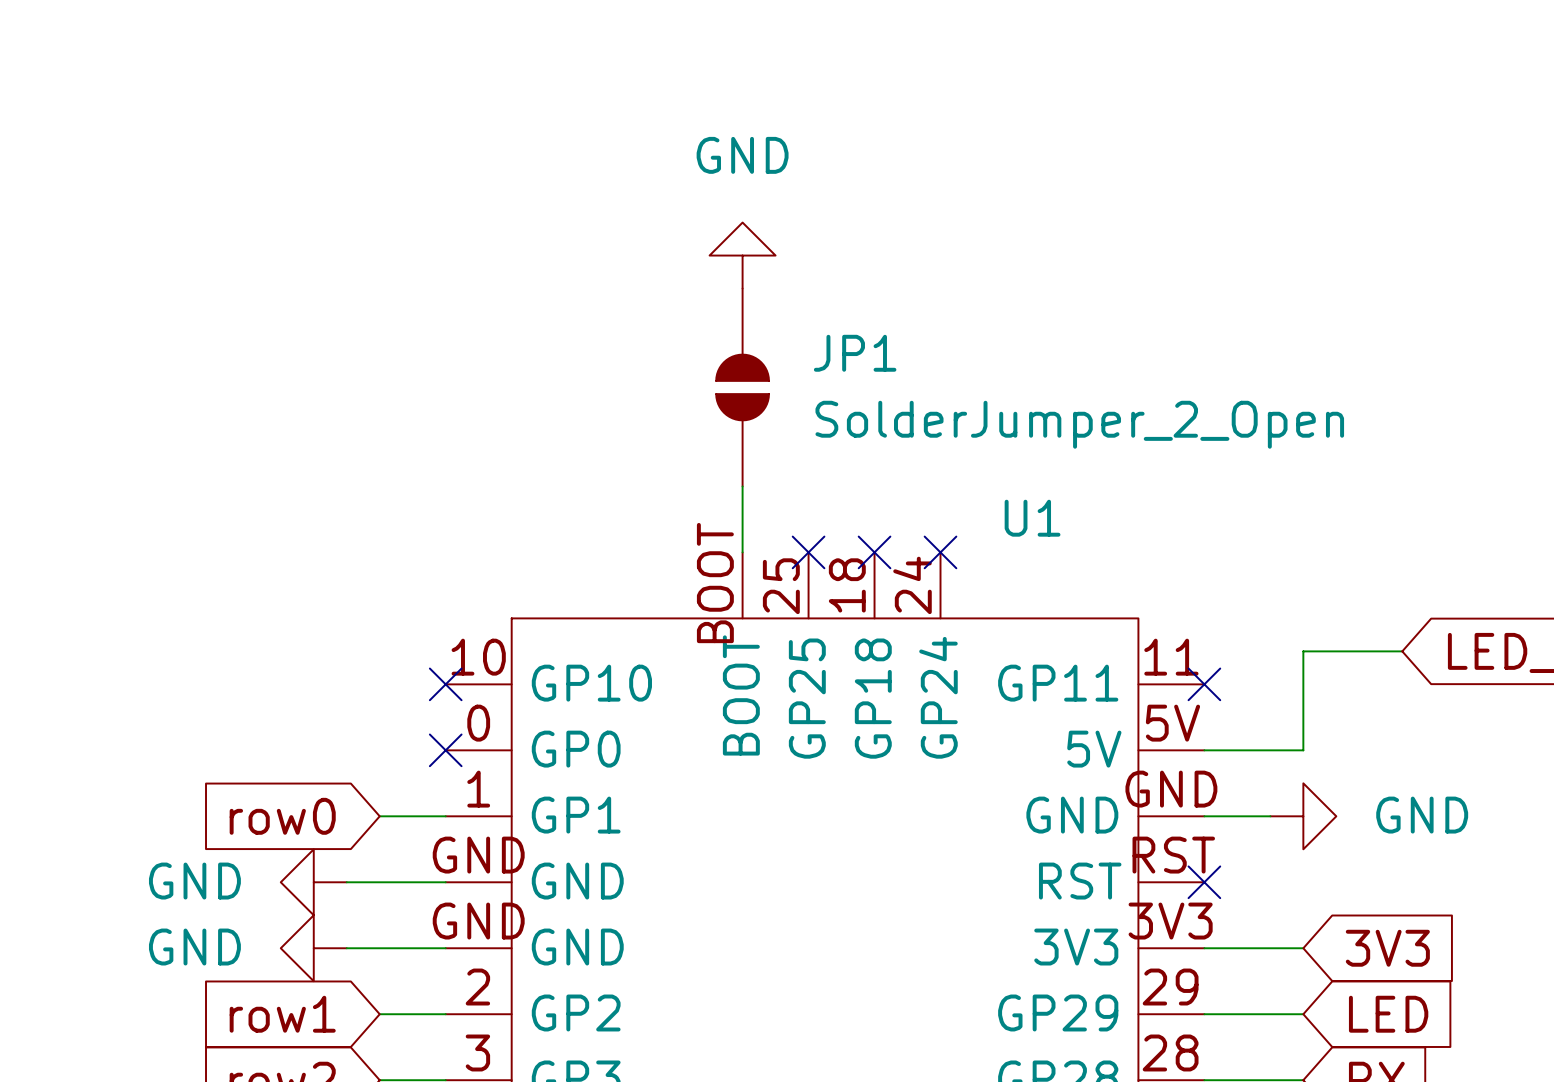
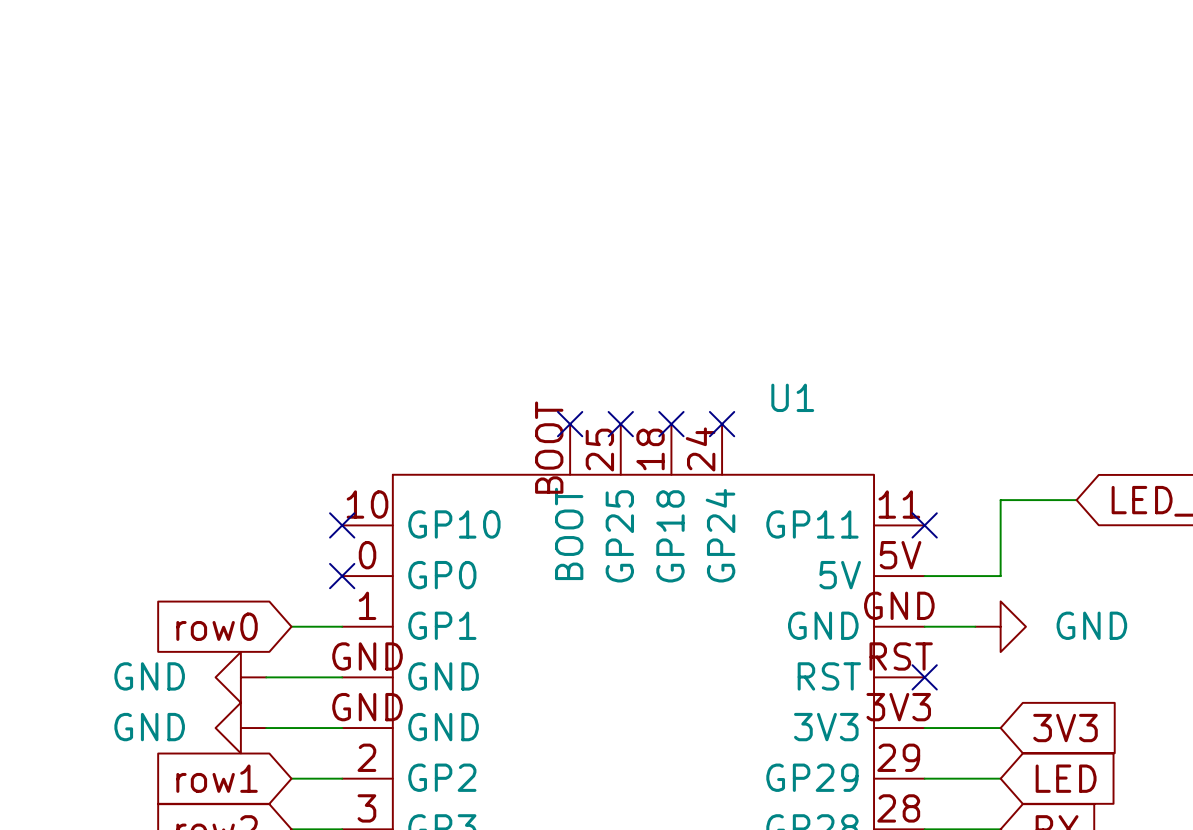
power symbol: GND (742, 255) -> none
JP1: SolderJumper_2_Open (742, 387) -> none
wire: (742, 486) (742, 552) -> none
no-connect mark: none -> (570, 424)

